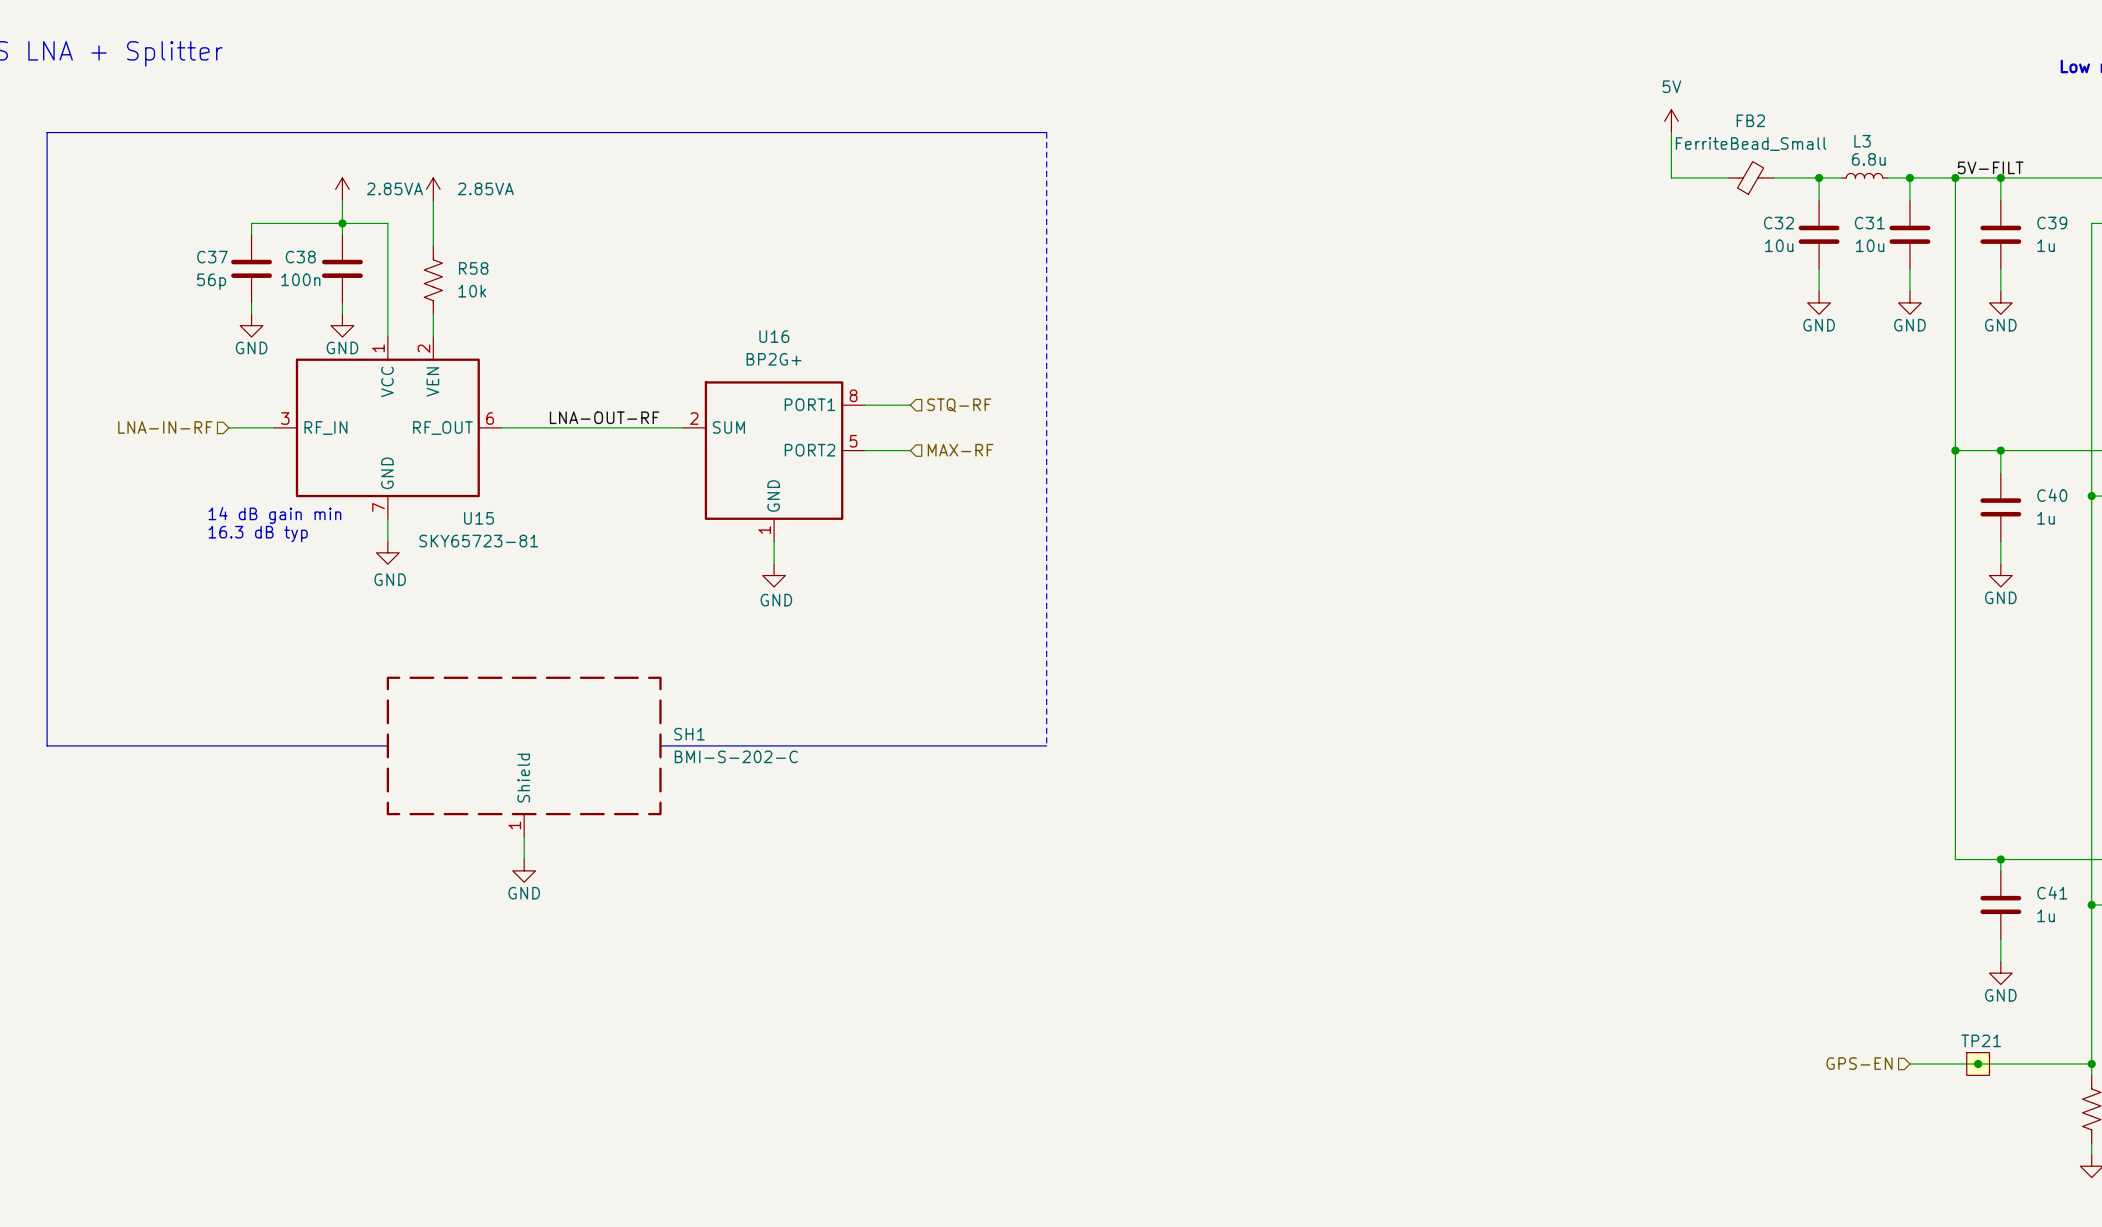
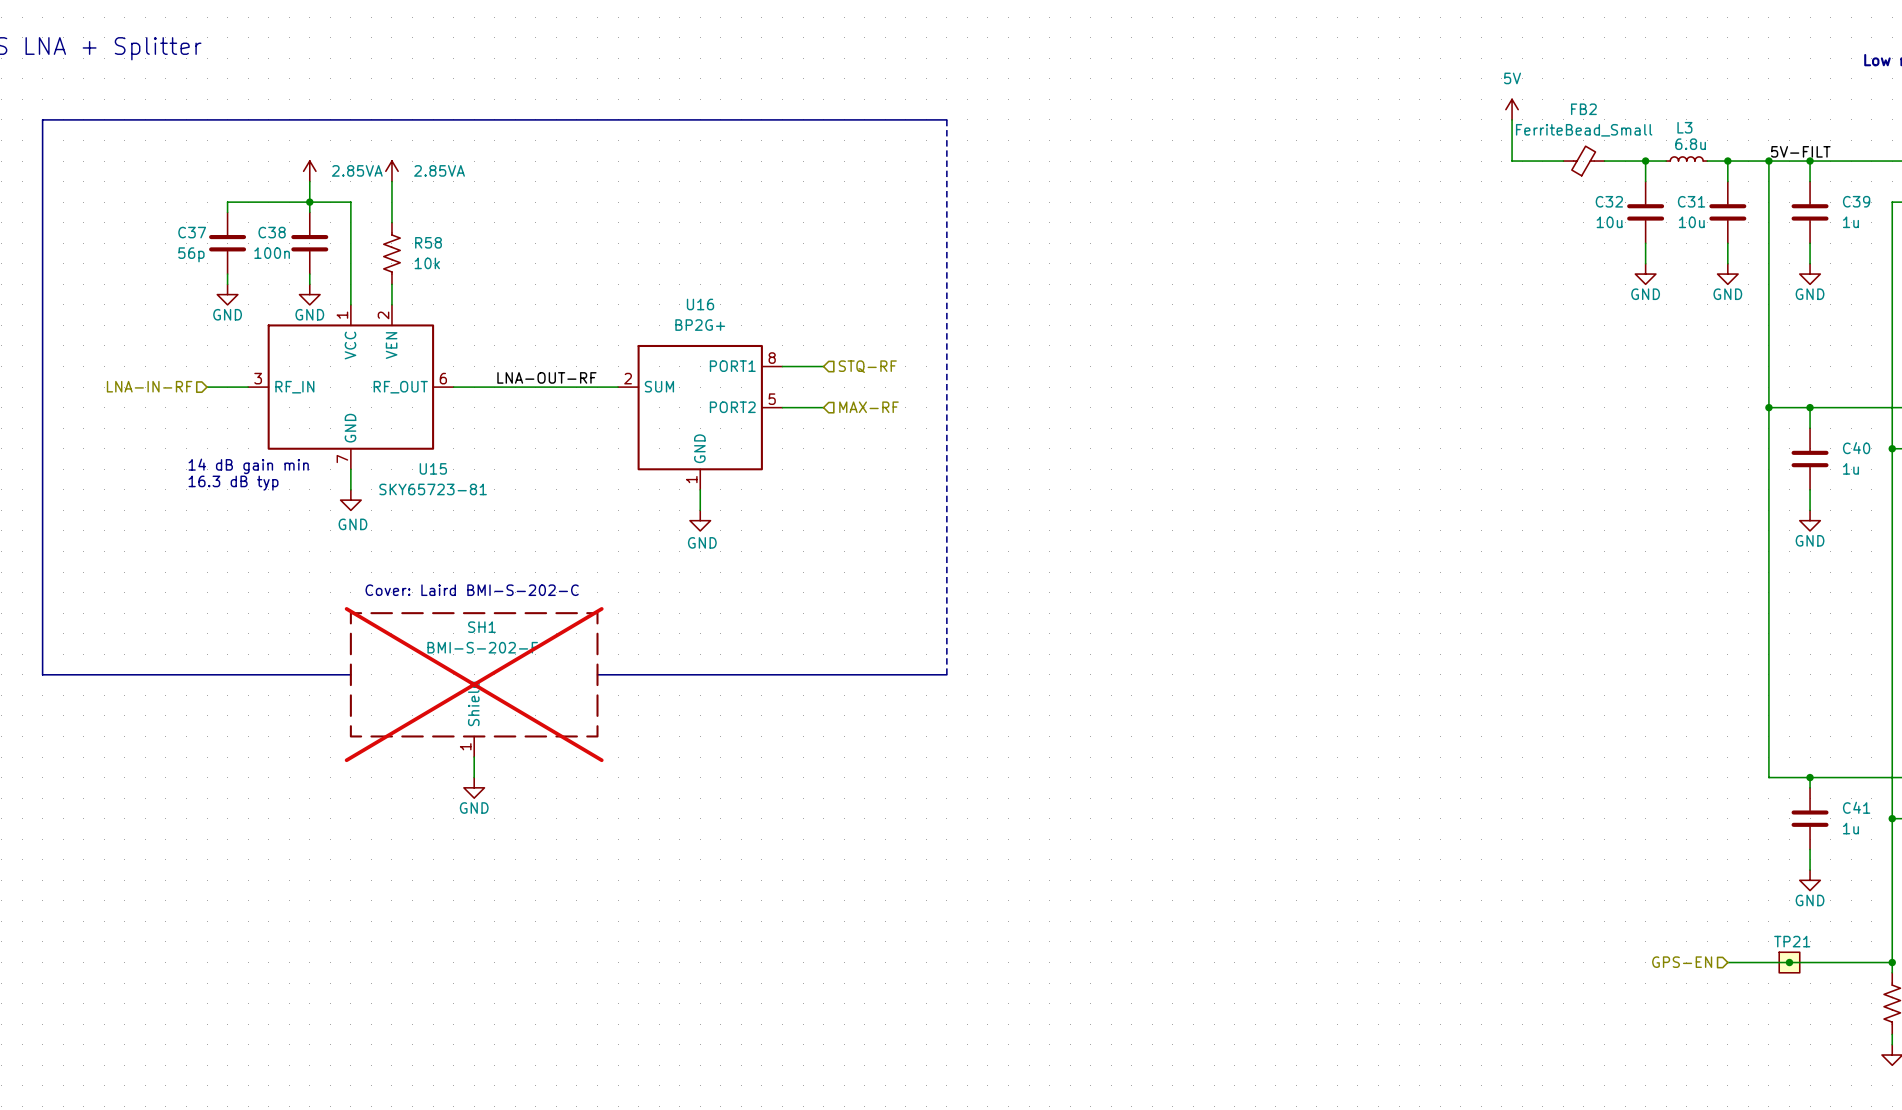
text: none -> Cover: Laird BMI-S-202-C (472, 590)
SH1 name position: SH1 (689, 734) -> SH1 (481, 627)
SH1 do-not-place cross: none -> (474, 684)
SH1 value: BMI-S-202-C (736, 756) -> BMI-S-202-F (482, 647)

